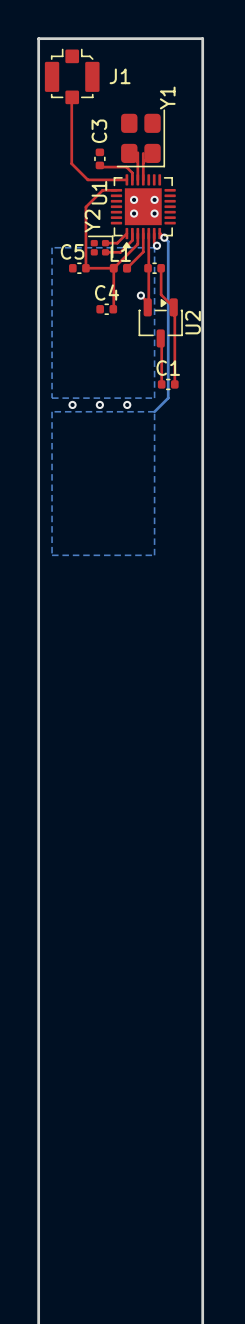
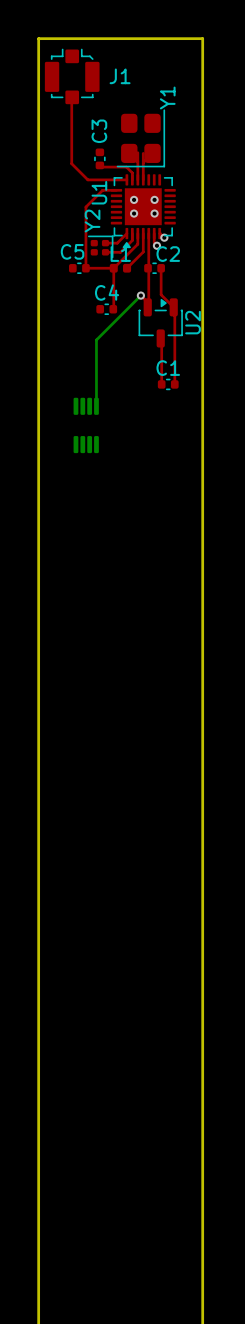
bottom track: (164, 237) (168, 241) (168, 398) (154, 411) -> none
bottom zone outline: (52, 247) (52, 398) (154, 398) (154, 247) (52, 247) -> none
C2 name: none -> C2 (168, 254)
bottom track: none -> (140, 295) (96, 340) (96, 406)
via: (72, 404) -> none
via: (99, 404) -> none
via: (127, 404) -> none
bottom zone outline: (52, 411) (154, 411) (154, 555) (52, 555) (52, 411) -> none
part: none -> (86, 425)

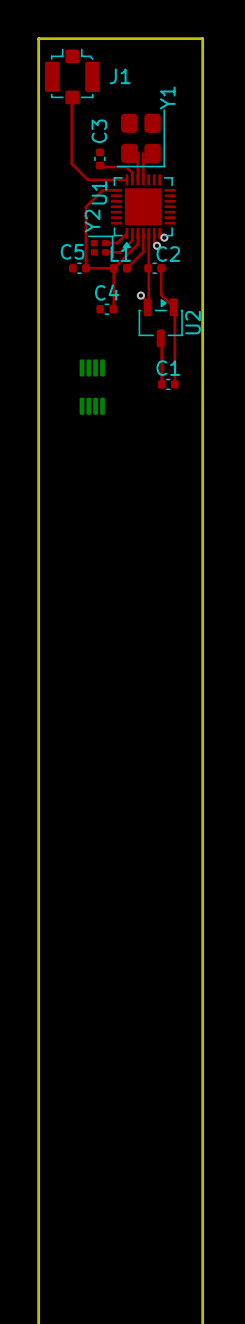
via: (134, 199) -> none
via: (154, 199) -> none
via: (134, 213) -> none
via: (154, 213) -> none
bottom track: (140, 295) (96, 340) (96, 406) -> none
part position: (86, 425) -> (92, 387)

